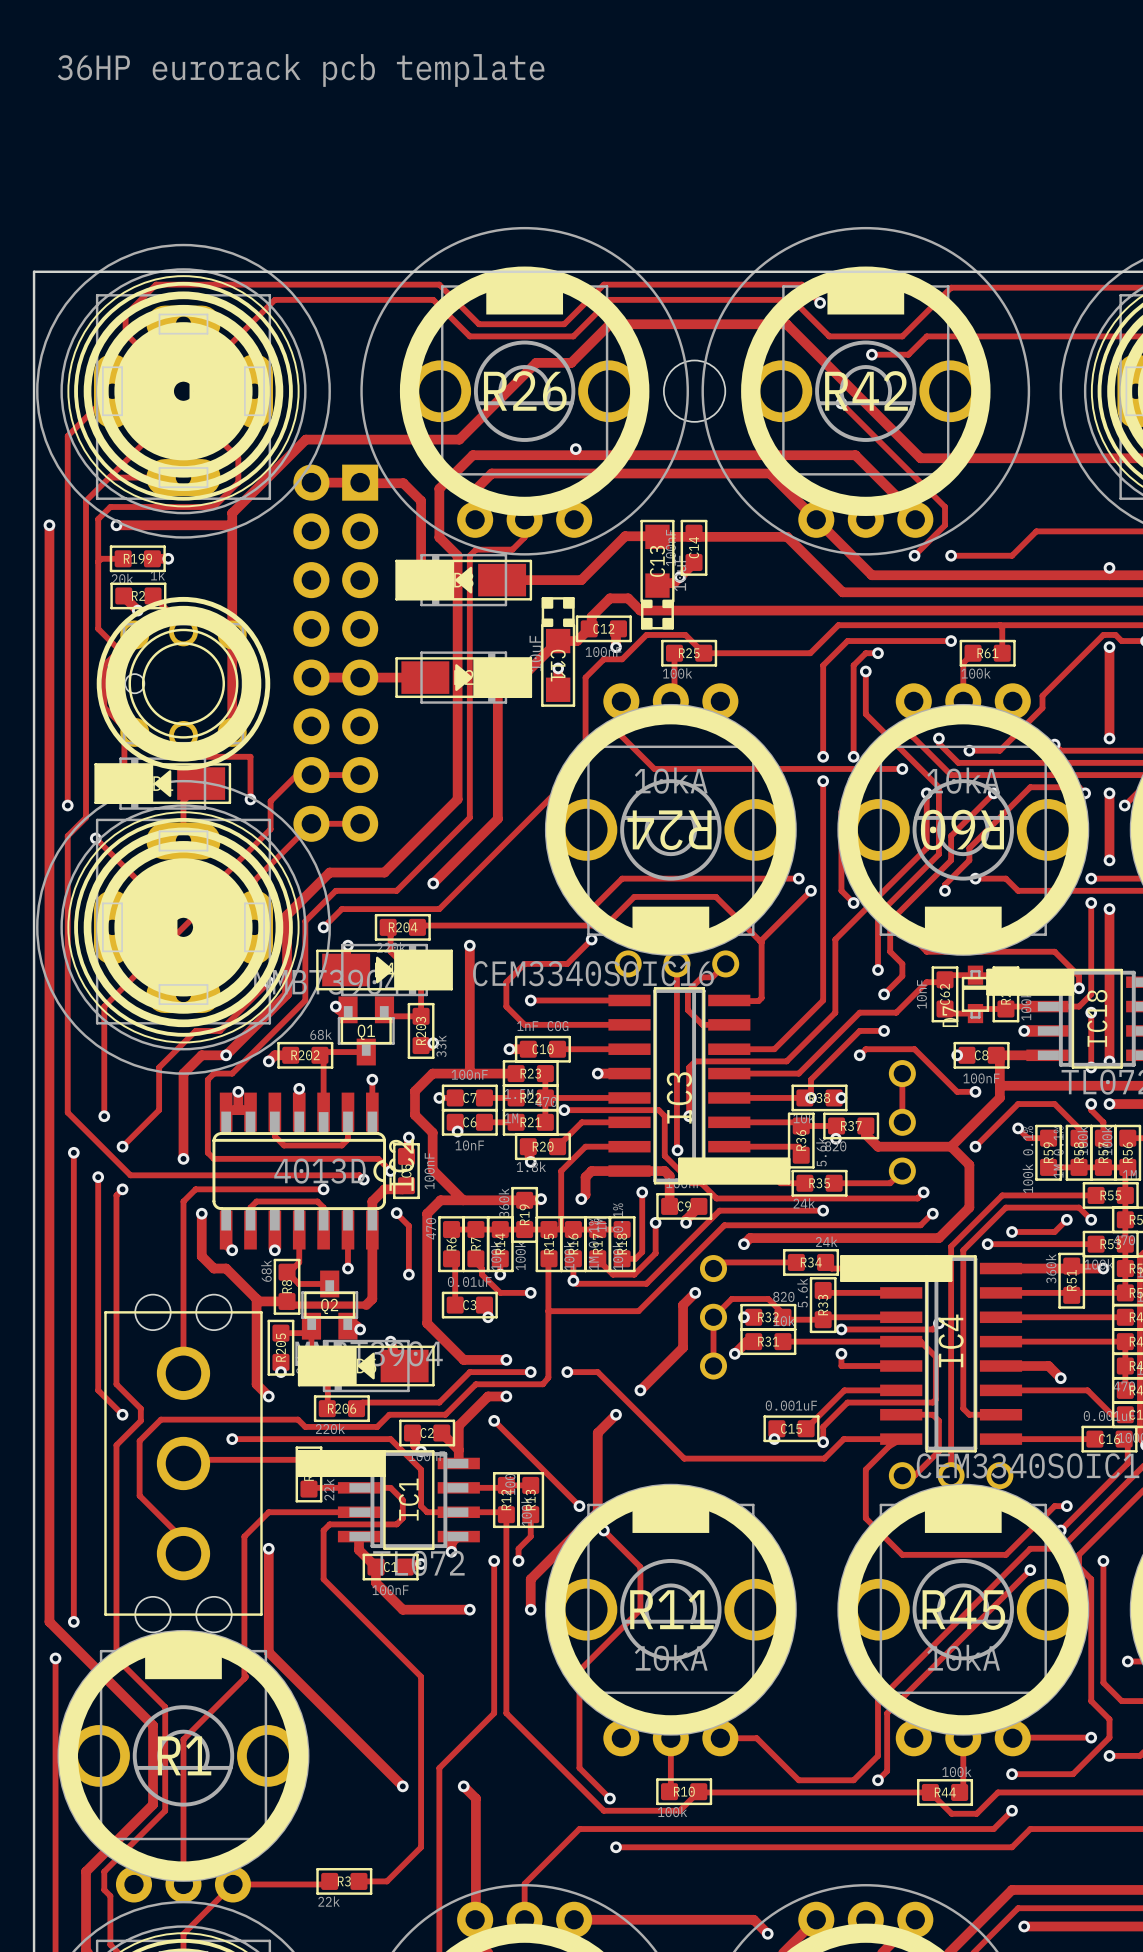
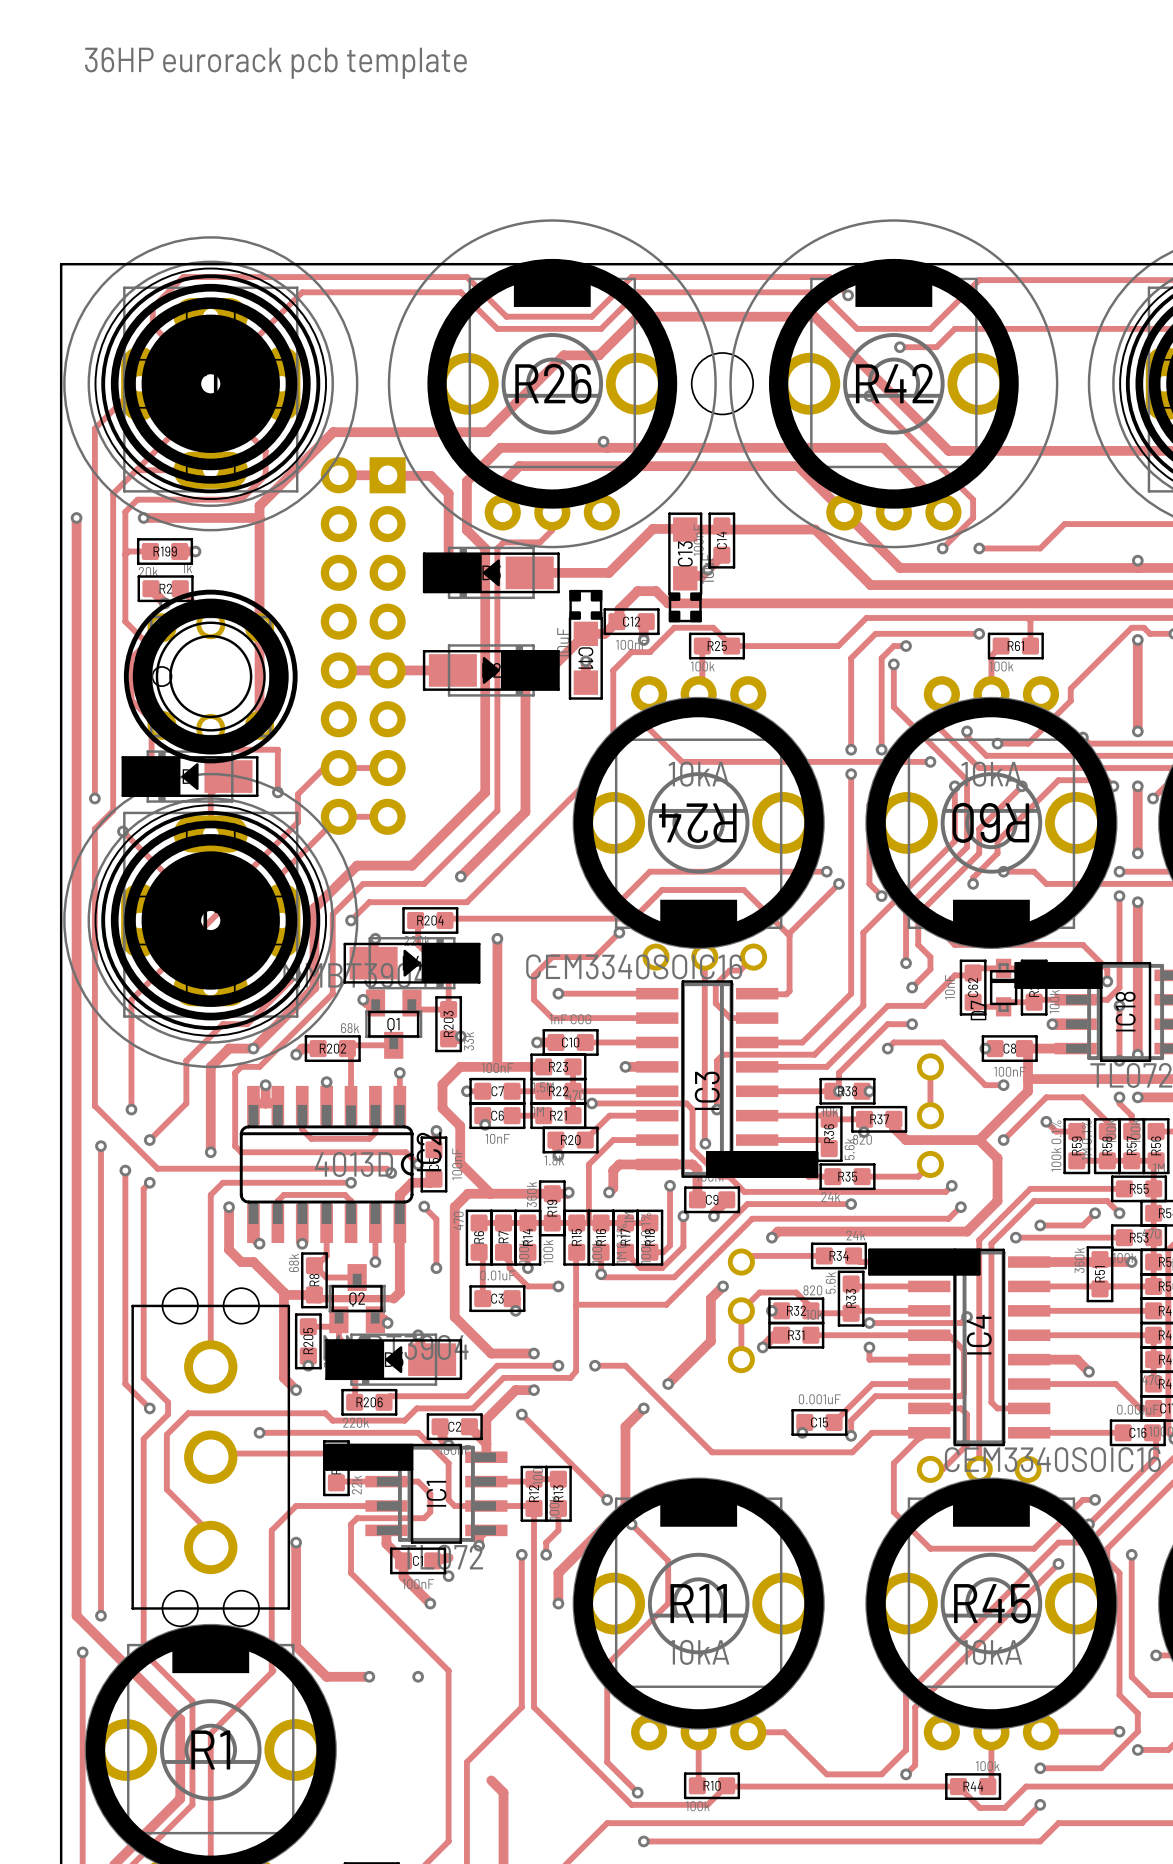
via position: (421, 1564) -> (448, 1576)
track: (402, 1609) (469, 1609) -> none
via: none -> (430, 1603)
via: (469, 1609) -> none
track: (299, 1682) (402, 1786) -> (326, 1676) (369, 1676)
via: none -> (369, 1676)
via: none -> (418, 1676)
via: (402, 1786) -> none
via: (463, 1786) -> none

